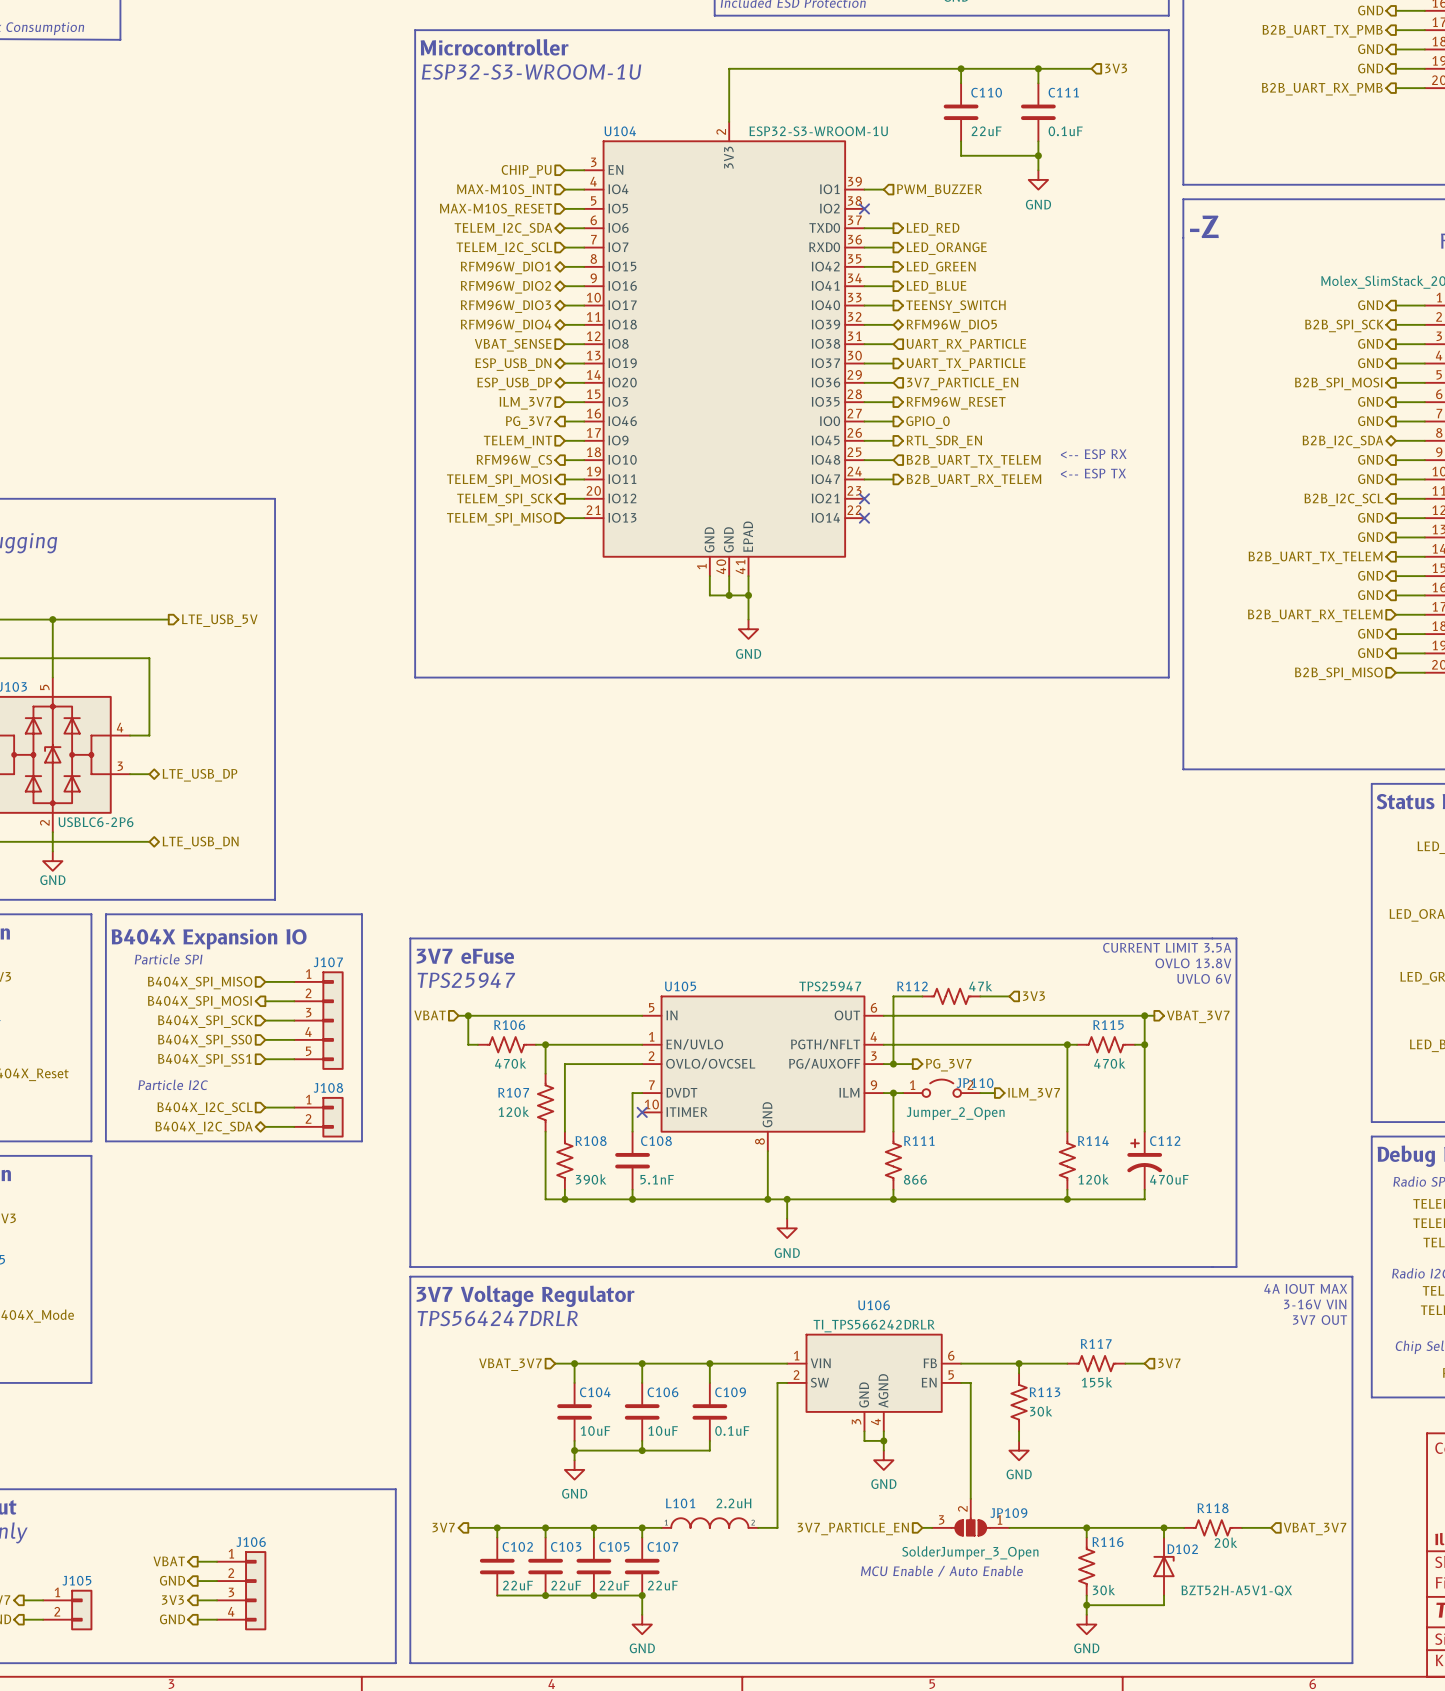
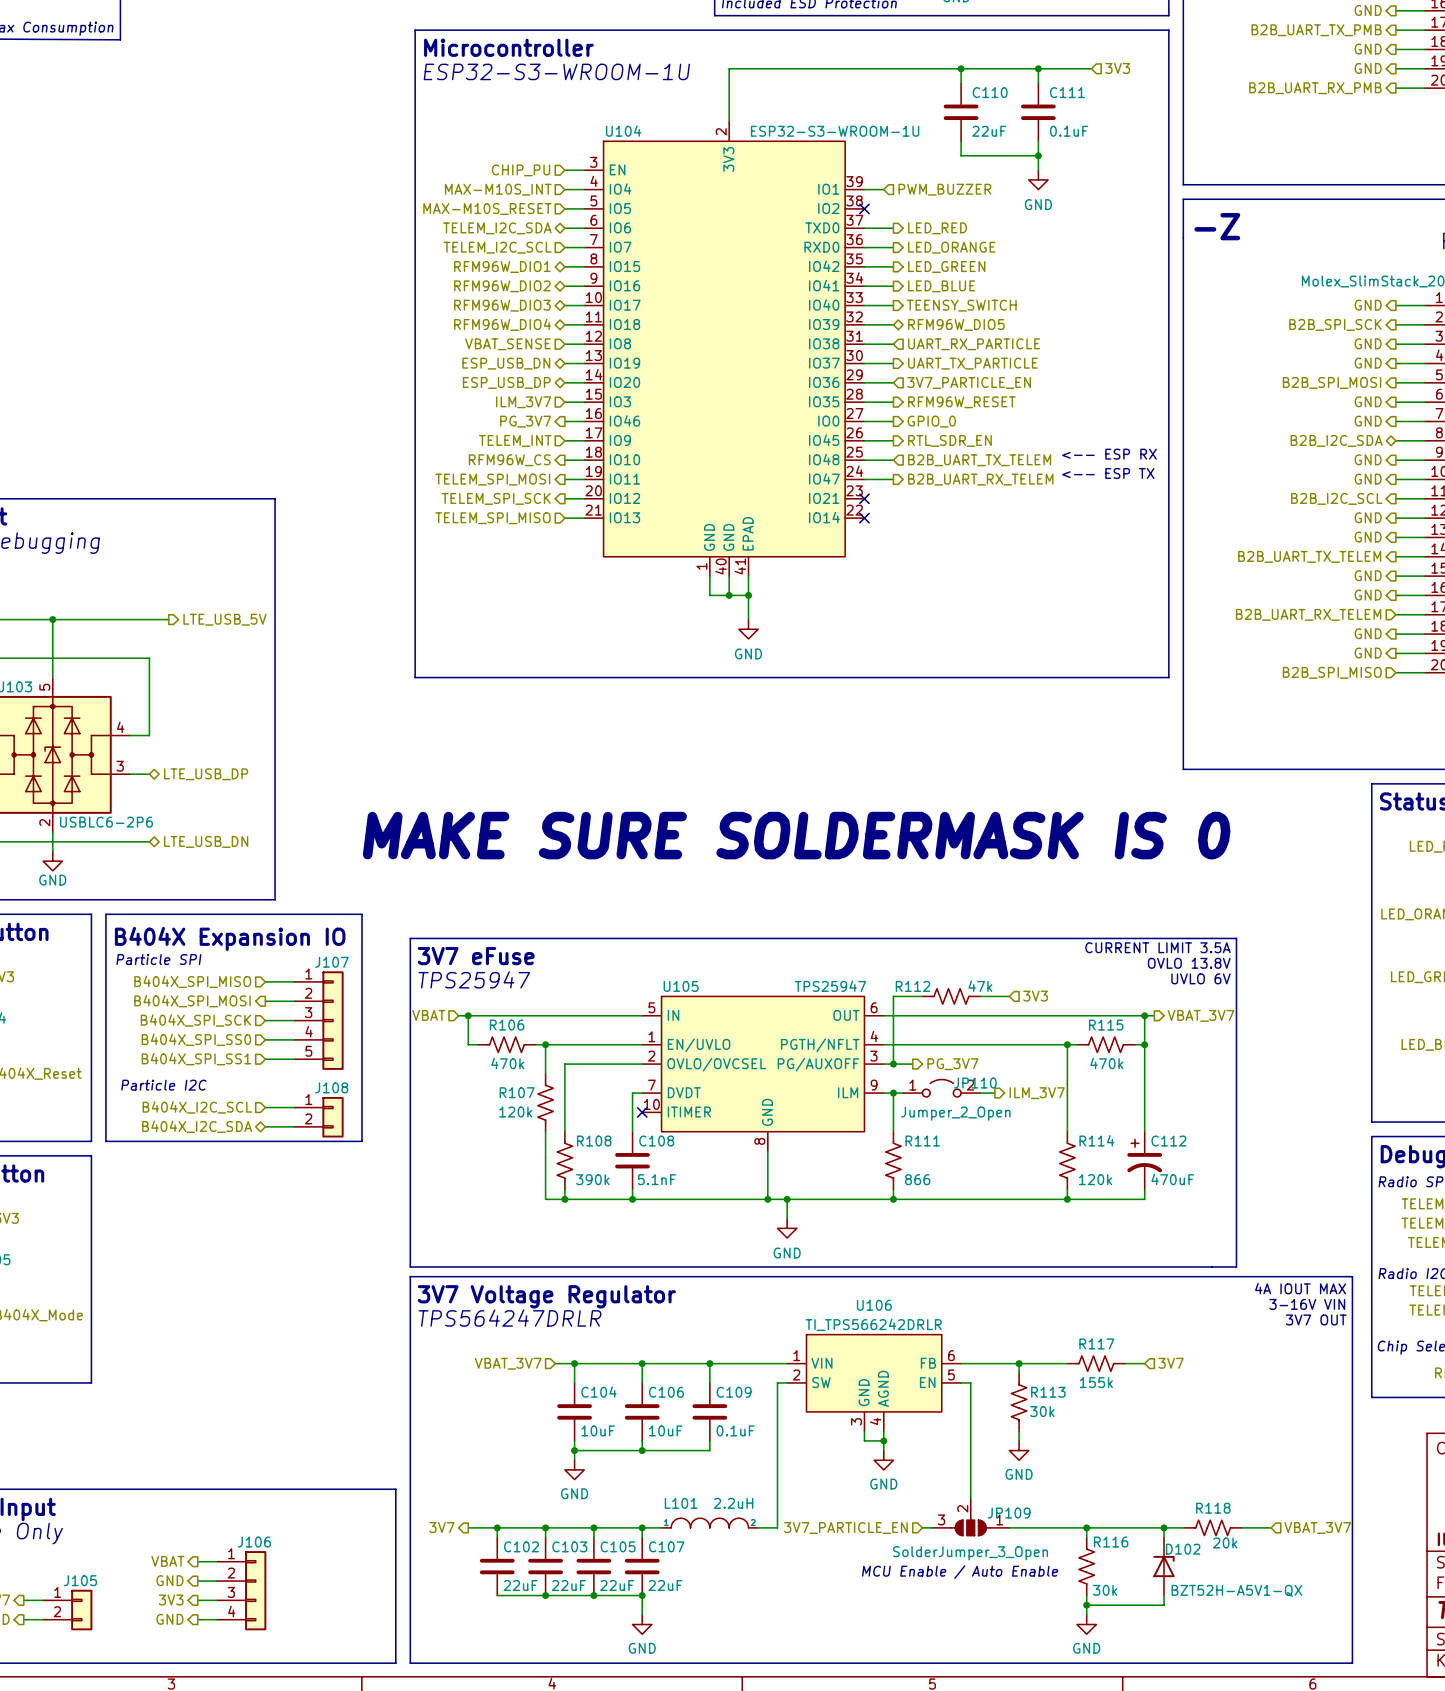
text: none -> MAKE SURE SOLDERMASK IS 0 (796, 835)

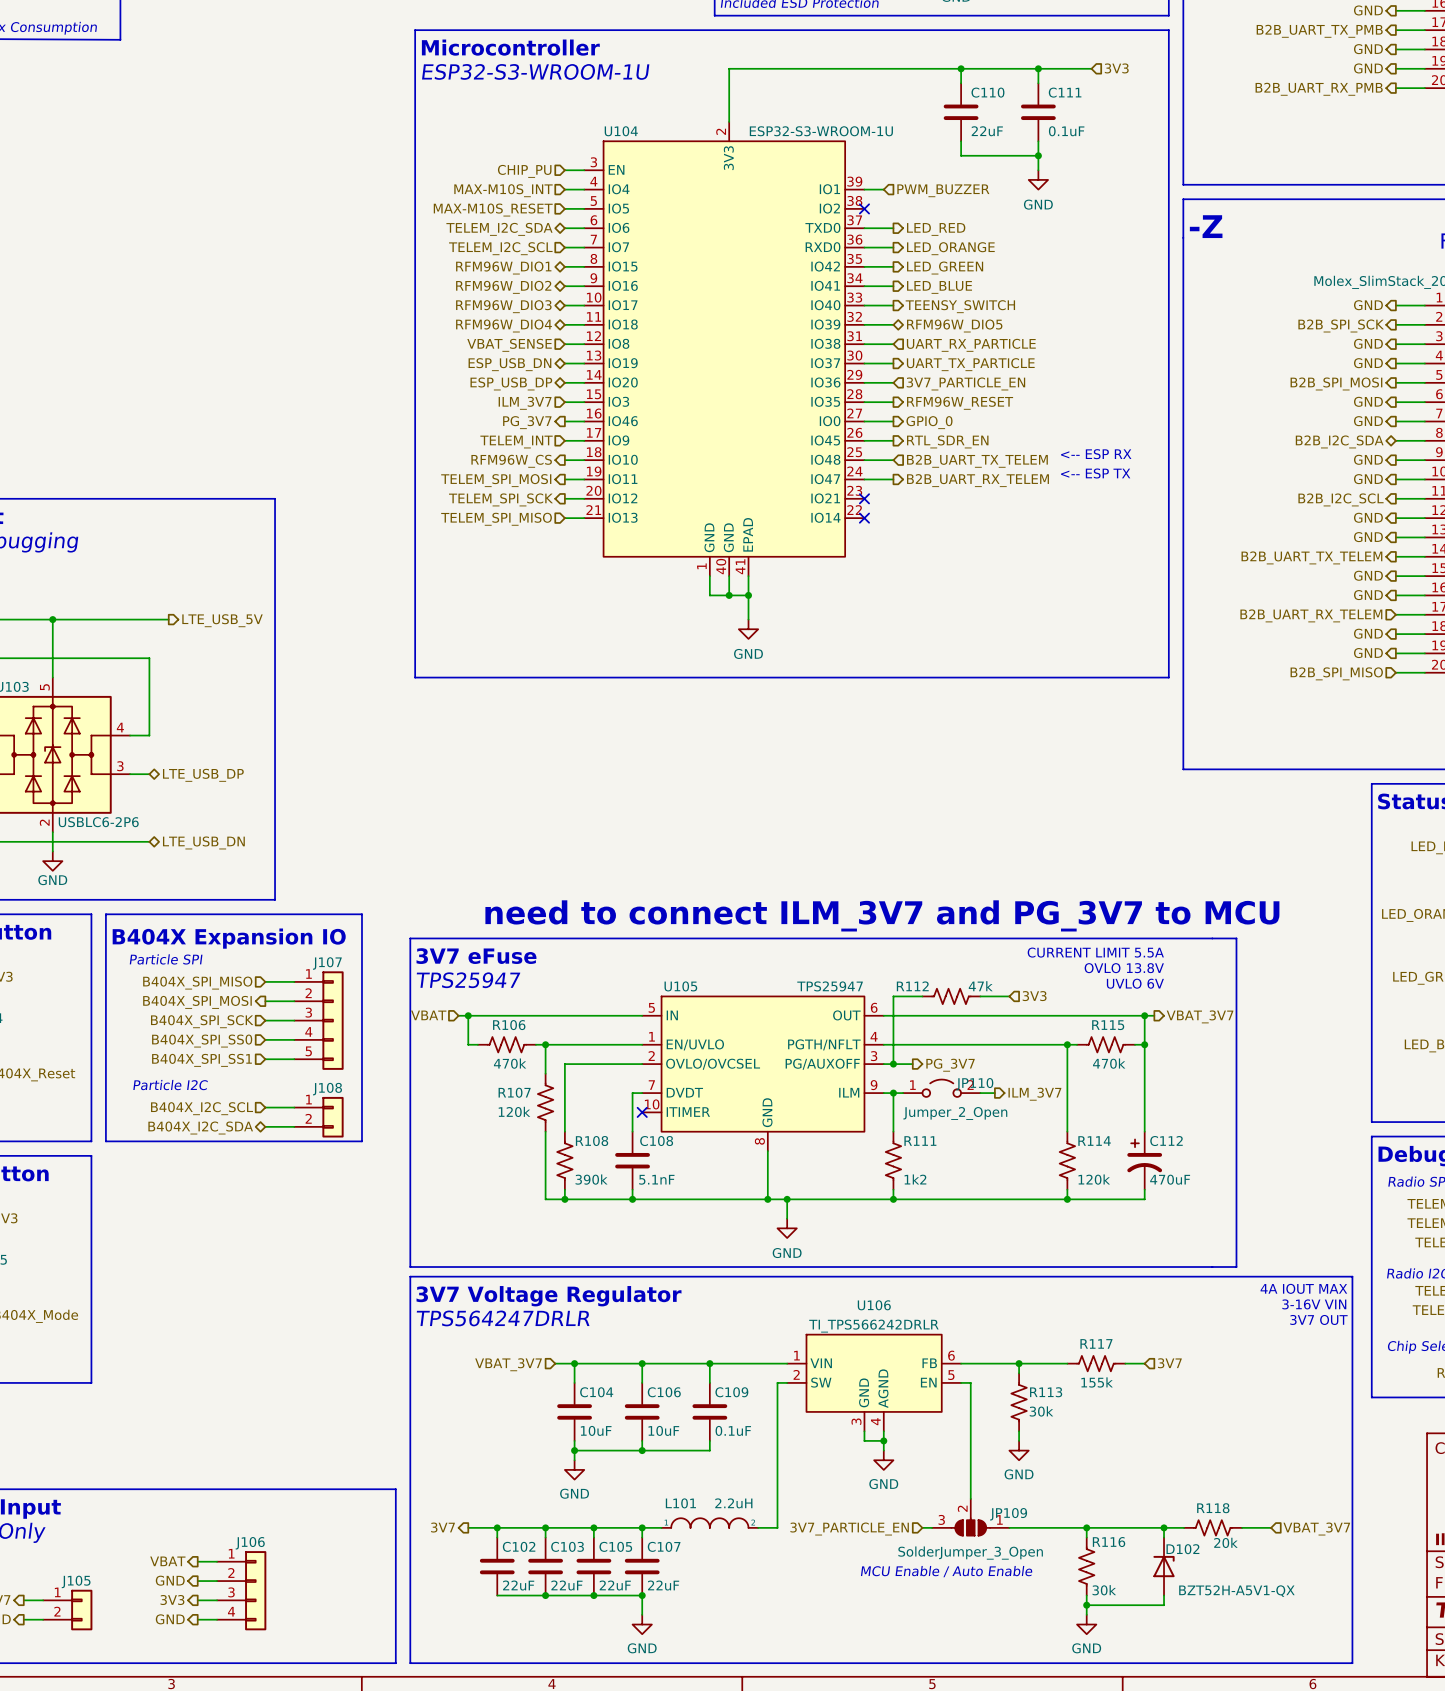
text: MAKE SURE SOLDERMASK IS 0 (796, 835) -> none
text: none -> need to connect ILM_3V7 and PG_3V7 to MCU (882, 915)
text: CURRENT LIMIT 3.5A (1157, 947) -> CURRENT LIMIT 5.5A (1095, 952)
text position: OVLO 13.8V (1189, 963) -> OVLO 13.8V (1124, 968)
text position: UVLO 6V (1200, 978) -> UVLO 6V (1135, 983)
R111 value: 866 (917, 1179) -> 1k2 (915, 1179)

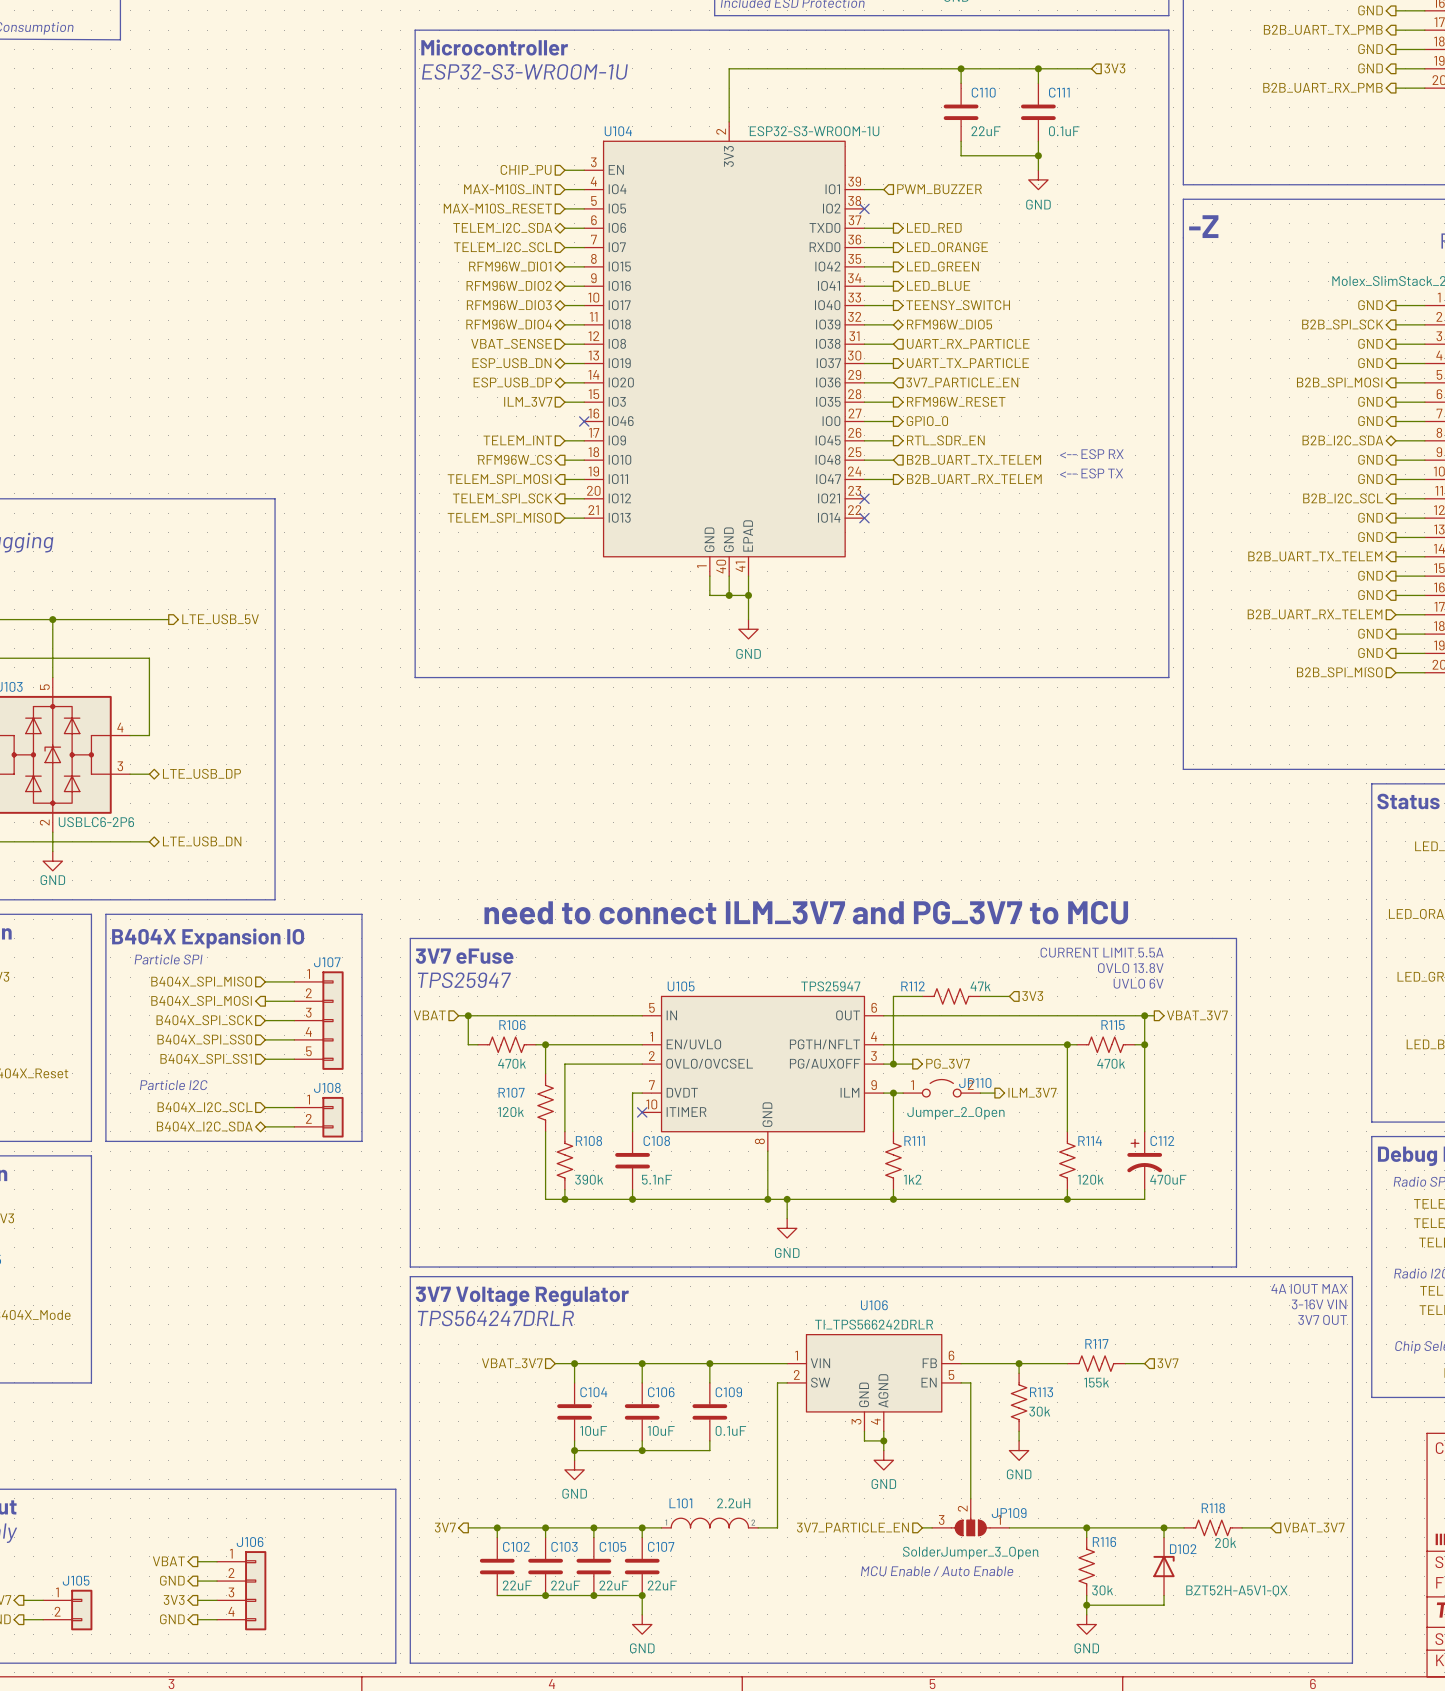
wire: (564, 421) (584, 421) -> none
no-connect mark: none -> (584, 421)
hierarchical label: PG_3V7 (527, 422) -> none

